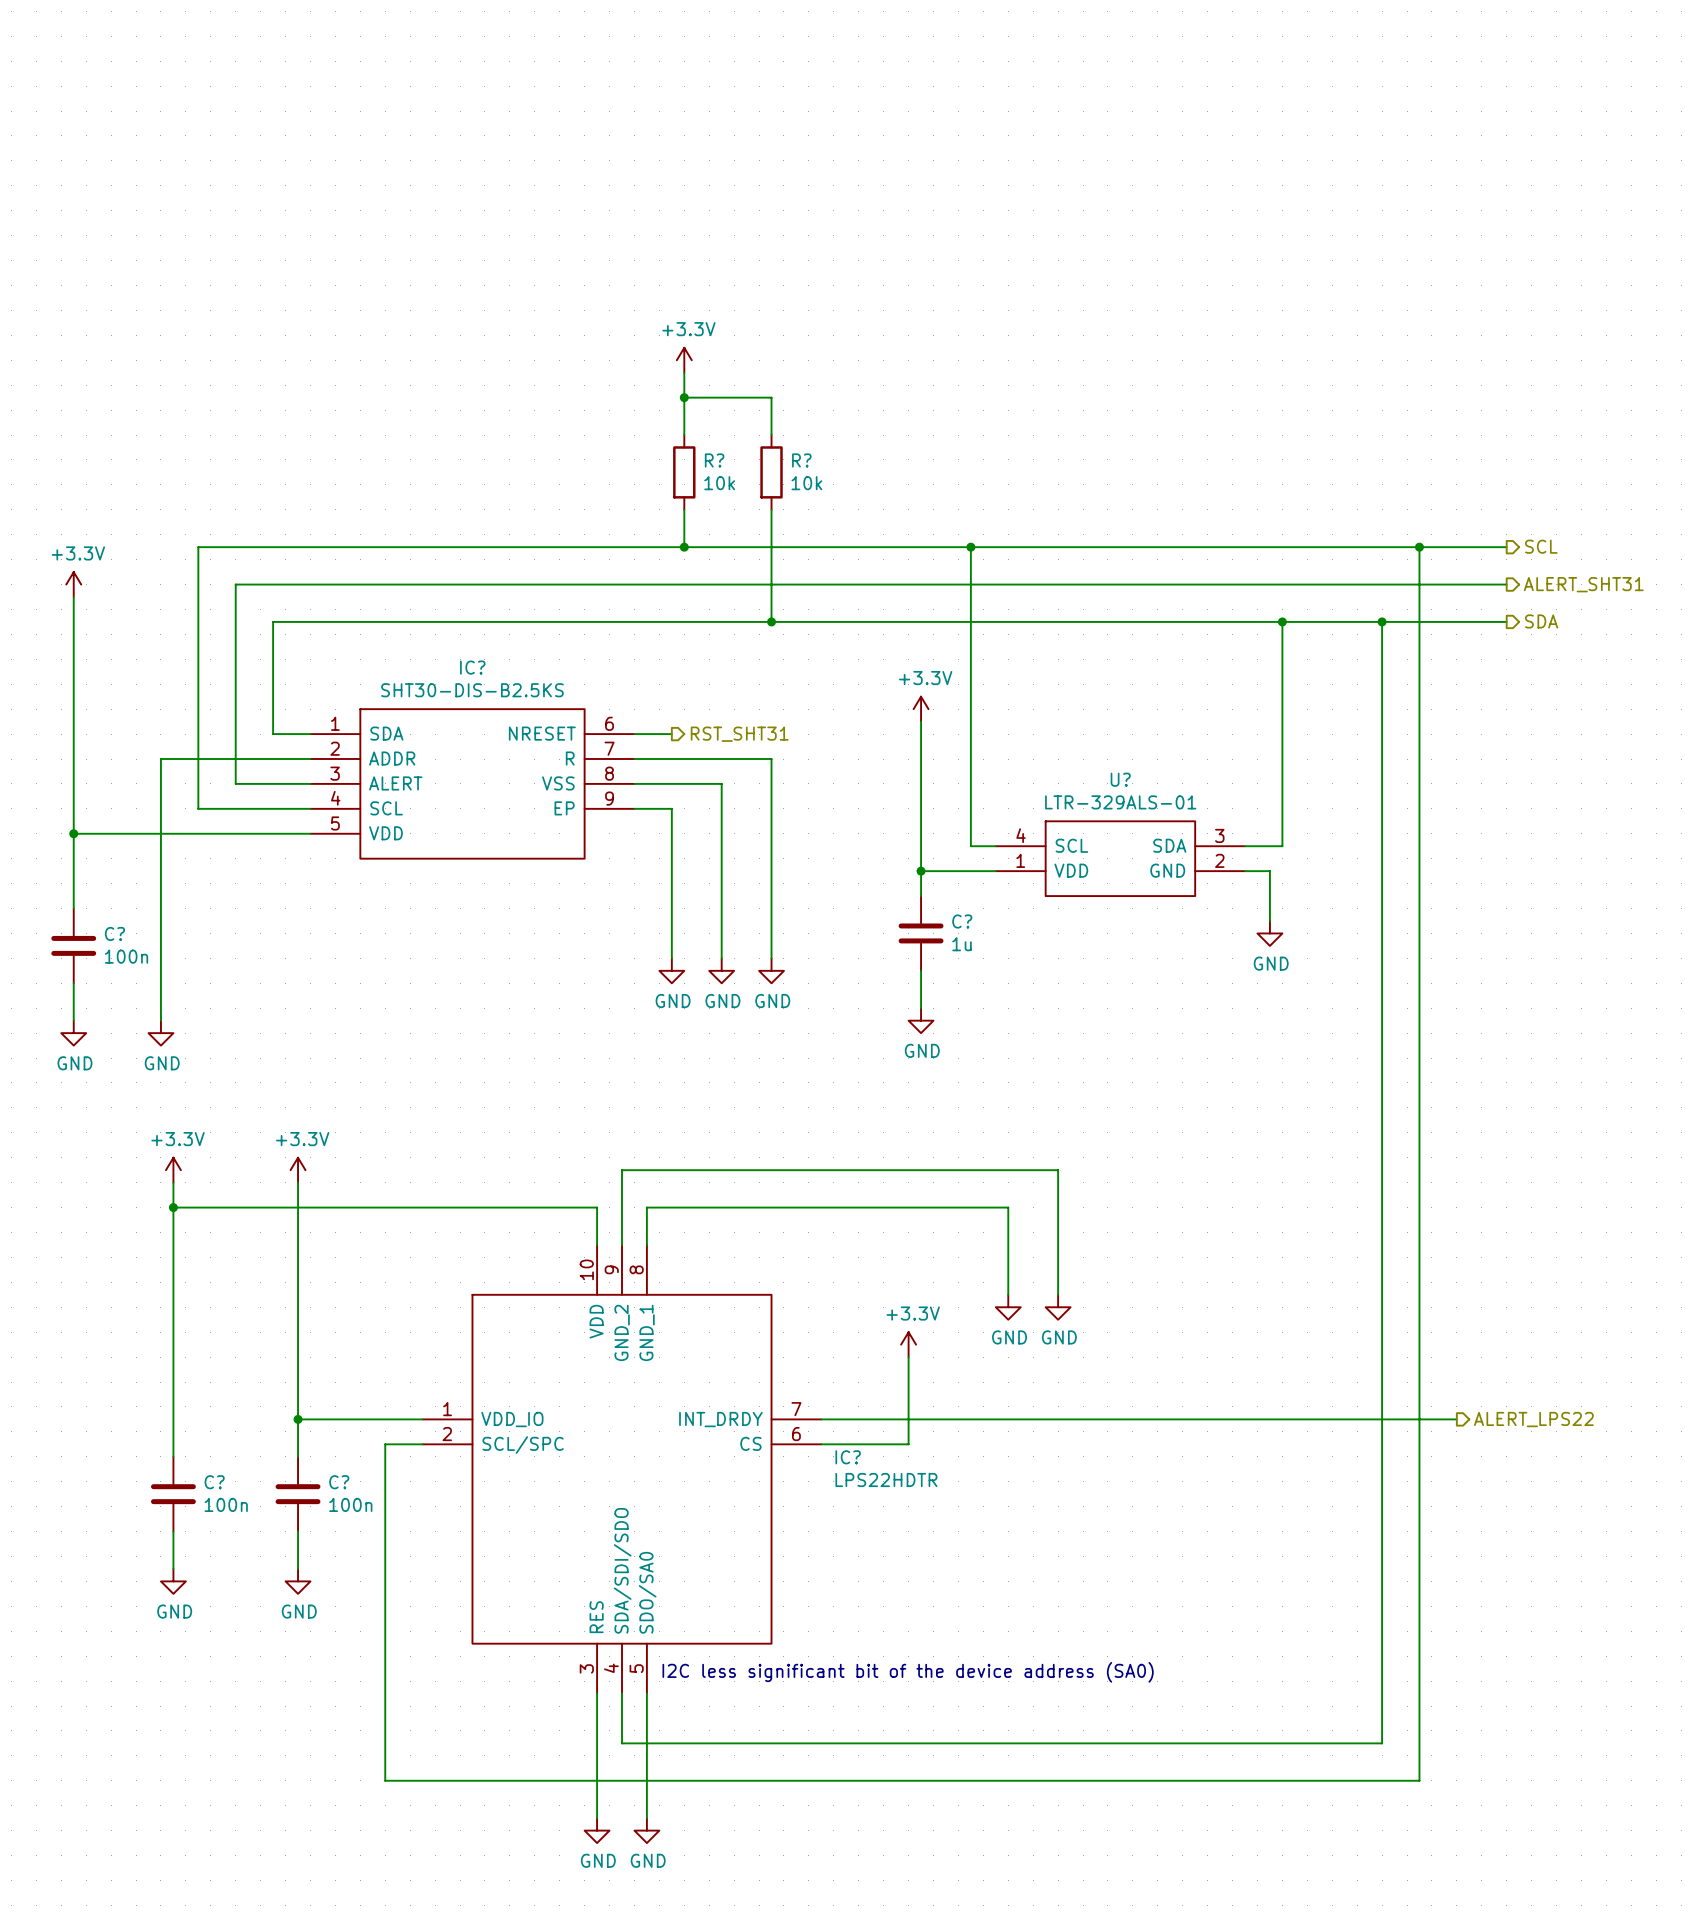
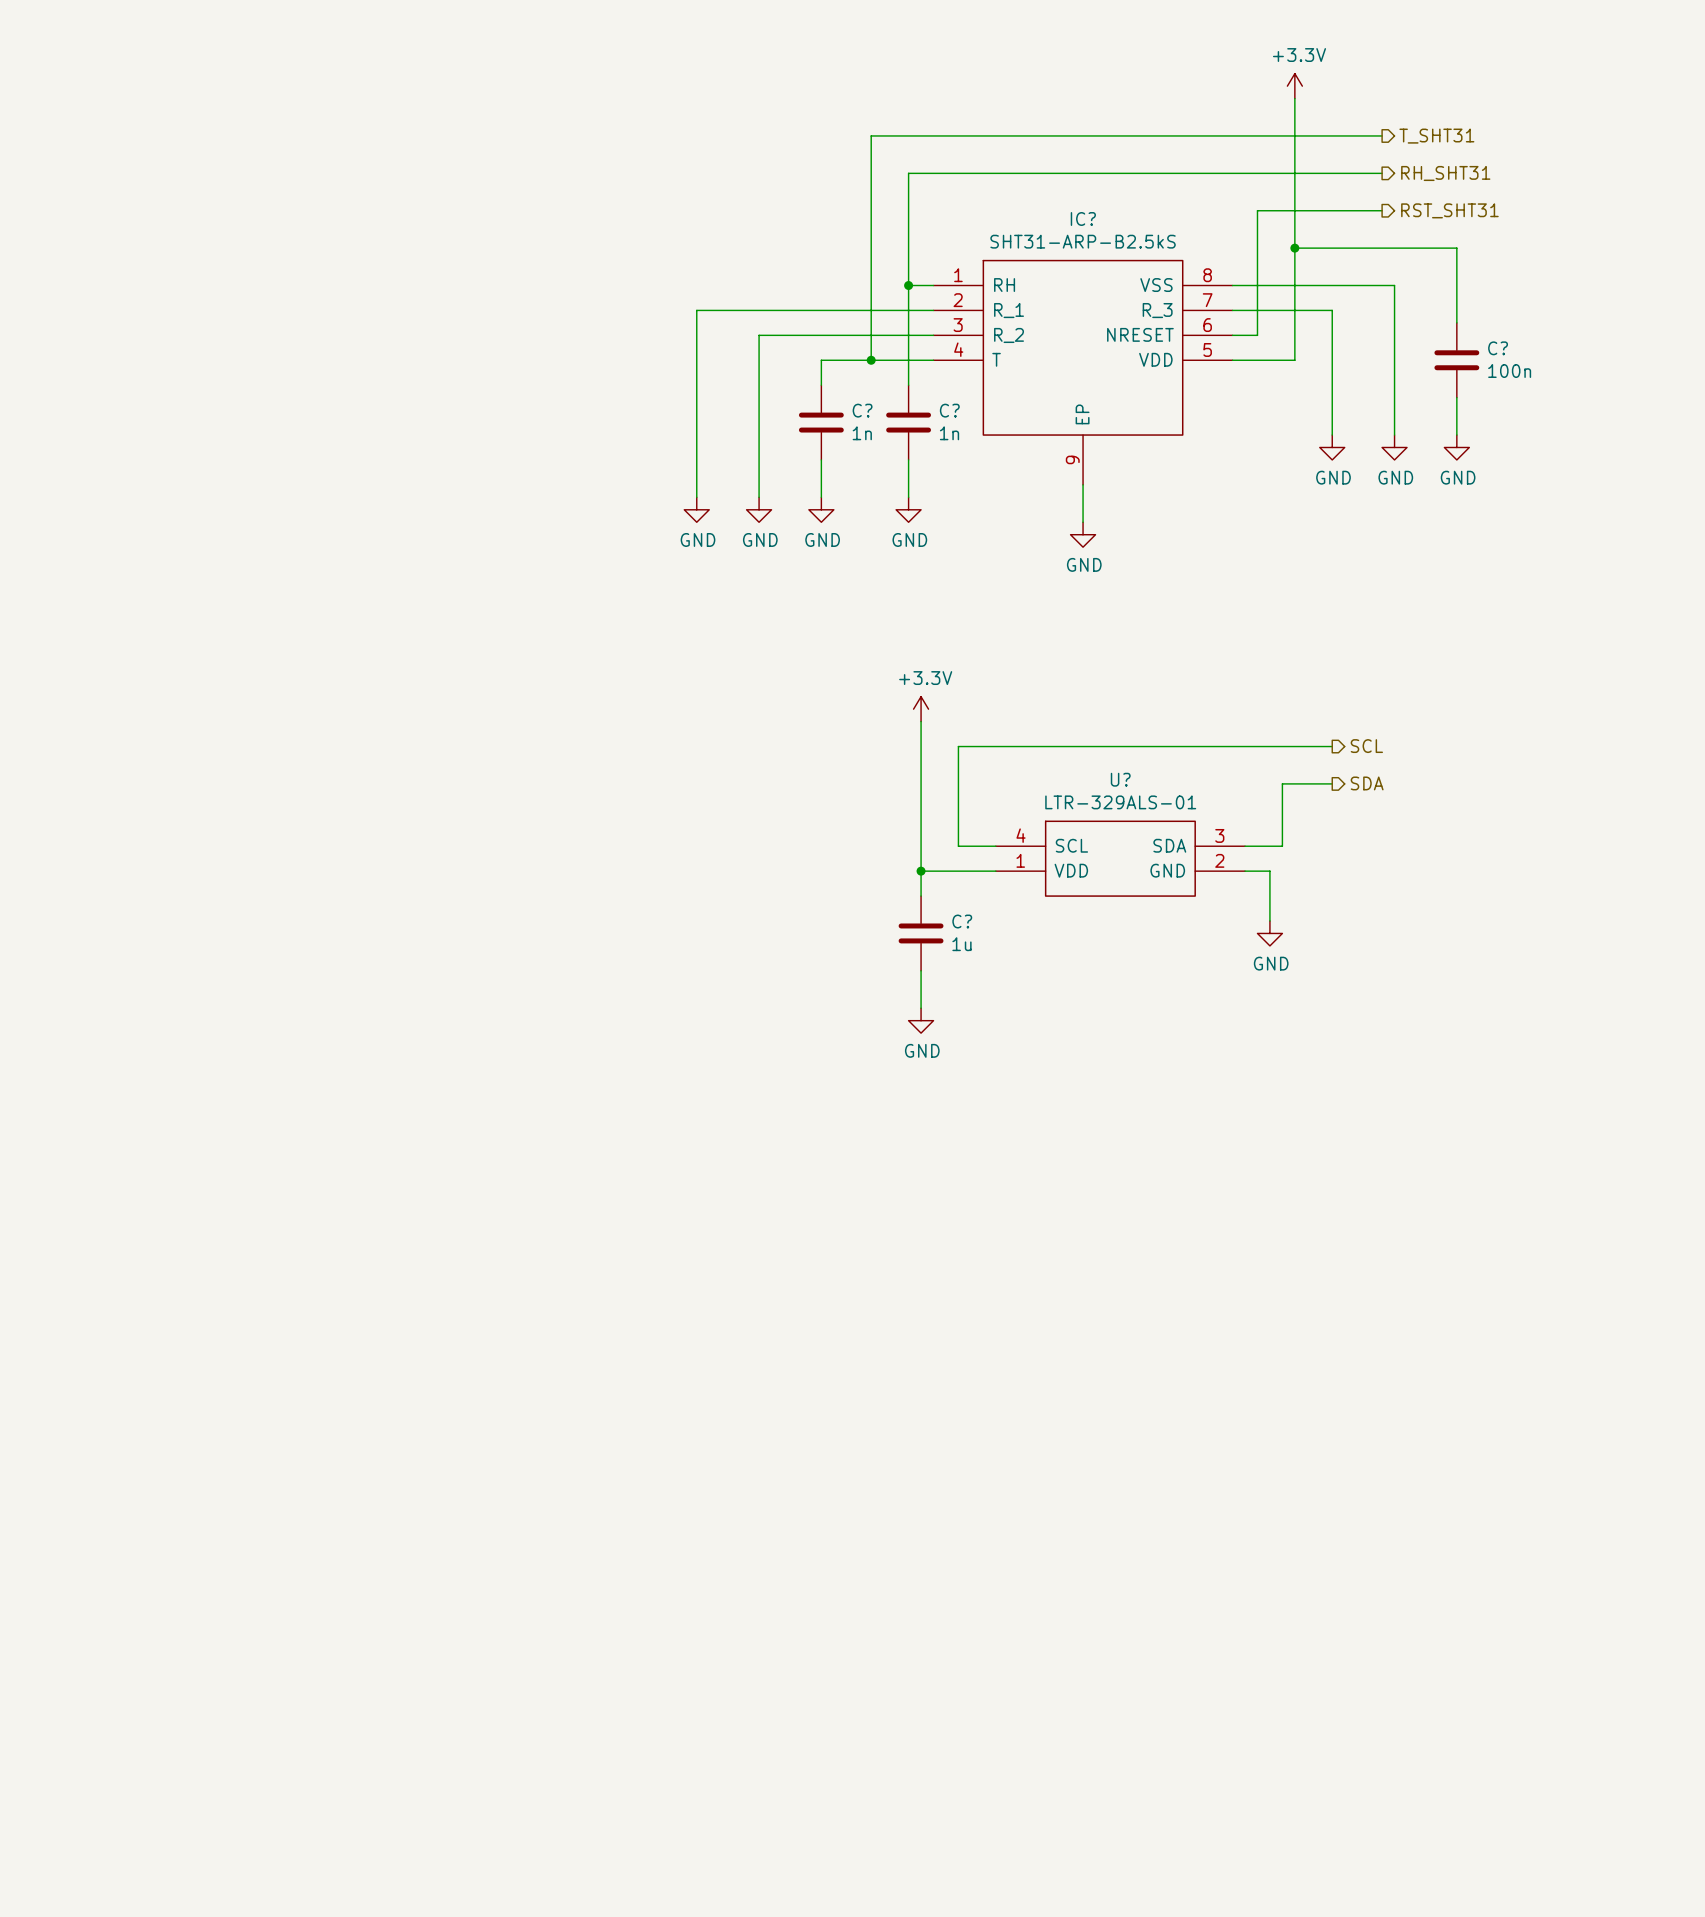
power symbol: none -> +3.3V (1294, 86)
wire: none -> (1294, 98) (1294, 360) (1232, 360)
wire: none -> (1382, 135) (871, 135) (871, 360)
hierarchical label: none -> T_SHT31 (1436, 136)
wire: none -> (1382, 173) (908, 173) (908, 385)
hierarchical label: none -> RH_SHT31 (1445, 173)
wire: none -> (1382, 210) (1257, 210) (1257, 335) (1232, 335)
hierarchical label: none -> RST_SHT31 (1449, 210)
wire: none -> (1294, 248) (1456, 248) (1456, 322)
junction: none -> (1294, 248)
wire: none -> (908, 285) (933, 285)
junction: none -> (908, 285)
wire: none -> (1232, 285) (1394, 285) (1394, 435)
wire: none -> (933, 310) (696, 310) (696, 497)
wire: none -> (1232, 310) (1332, 310) (1332, 435)
wire: none -> (933, 335) (759, 335) (759, 497)
power symbol: +3.3V (684, 360) -> none
junction: none -> (871, 360)
wire: none -> (933, 360) (821, 360) (821, 385)
C?: none -> 100n (1456, 360)
wire: (684, 372) (684, 435) -> none
IC?: none -> SHT31-ARP-B2.5kS (1083, 372)
wire: (684, 397) (771, 397) (771, 435) -> none
junction: (684, 397) -> none
wire: none -> (1456, 397) (1456, 435)
C?: none -> 1n (821, 422)
C?: none -> 1n (908, 422)
power symbol: none -> GND (1332, 447)
power symbol: none -> GND (1394, 447)
power symbol: none -> GND (1456, 447)
wire: none -> (908, 459) (908, 497)
R?: 10k (684, 472) -> none
R?: 10k (771, 472) -> none
wire: none -> (1083, 484) (1083, 522)
wire: (684, 509) (684, 547) -> (821, 459) (821, 497)
power symbol: none -> GND (696, 509)
power symbol: none -> GND (759, 509)
wire: (771, 509) (771, 621) -> none
power symbol: none -> GND (821, 509)
power symbol: none -> GND (908, 509)
power symbol: none -> GND (1083, 534)
hierarchical label: SCL (1541, 546) -> none
junction: (684, 547) -> none
wire: (970, 547) (970, 846) -> (1332, 746) (958, 746) (958, 846) (970, 846)
junction: (970, 547) -> none
wire: (1419, 547) (1419, 1780) (385, 1780) (385, 1444) (422, 1444) -> none
junction: (1419, 547) -> none
wire: (1506, 547) (198, 547) (198, 808) (310, 808) -> none
power symbol: +3.3V (73, 584) -> none
wire: (1506, 584) (235, 584) (235, 783) (310, 783) -> none
hierarchical label: ALERT_SHT31 (1583, 584) -> none
wire: (73, 597) (73, 908) -> none
junction: (771, 621) -> none
wire: (1282, 621) (1282, 783) -> (1332, 783) (1282, 783)
junction: (1282, 621) -> none
wire: (1382, 621) (1382, 1743) (622, 1743) (622, 1693) -> none
junction: (1382, 621) -> none
wire: (1506, 621) (273, 621) (273, 734) (310, 734) -> none
hierarchical label position: SDA (1541, 621) -> SDA (1367, 783)
wire: (634, 734) (671, 734) -> none
hierarchical label: RST_SHT31 (739, 734) -> none
hierarchical label: none -> SCL (1366, 746)
wire: (310, 759) (160, 759) (160, 1020) -> none
wire: (634, 759) (771, 759) (771, 958) -> none
IC?: SHT30-DIS-B2.5KS (472, 783) -> none
wire: (634, 783) (721, 783) (721, 958) -> none
wire: (634, 808) (671, 808) (671, 958) -> none
wire: (73, 833) (310, 833) -> none
junction: (73, 833) -> none
C?: 100n (73, 945) -> none
power symbol: GND (671, 970) -> none
power symbol: GND (721, 970) -> none
power symbol: GND (771, 970) -> none
wire: (73, 983) (73, 1020) -> none
power symbol: GND (73, 1033) -> none
power symbol: GND (160, 1033) -> none
power symbol: +3.3V (173, 1170) -> none
power symbol: +3.3V (298, 1170) -> none
wire: (173, 1182) (173, 1456) -> none
wire: (298, 1182) (298, 1456) -> none
wire: (173, 1207) (597, 1207) (597, 1244) -> none
junction: (173, 1207) -> none
wire: (622, 1244) (622, 1170) (1058, 1170) (1058, 1294) -> none
wire: (646, 1244) (646, 1207) (1008, 1207) (1008, 1294) -> none
power symbol: GND (1008, 1307) -> none
power symbol: GND (1058, 1307) -> none
power symbol: +3.3V (908, 1344) -> none
wire: (908, 1357) (908, 1444) (821, 1444) -> none
wire: (298, 1419) (422, 1419) -> none
junction: (298, 1419) -> none
wire: (821, 1419) (1456, 1419) -> none
hierarchical label: ALERT_LPS22 (1533, 1419) -> none
IC?: LPS22HDTR (622, 1469) -> none
C?: 100n (173, 1494) -> none
C?: 100n (298, 1494) -> none
wire: (173, 1531) (173, 1568) -> none
wire: (298, 1531) (298, 1568) -> none
power symbol: GND (173, 1581) -> none
power symbol: GND (298, 1581) -> none
text: I2C less significant bit of the device address (SA0) (908, 1672) -> none
wire: (597, 1693) (597, 1818) -> none
wire: (646, 1693) (646, 1818) -> none
power symbol: GND (597, 1830) -> none
power symbol: GND (646, 1830) -> none

